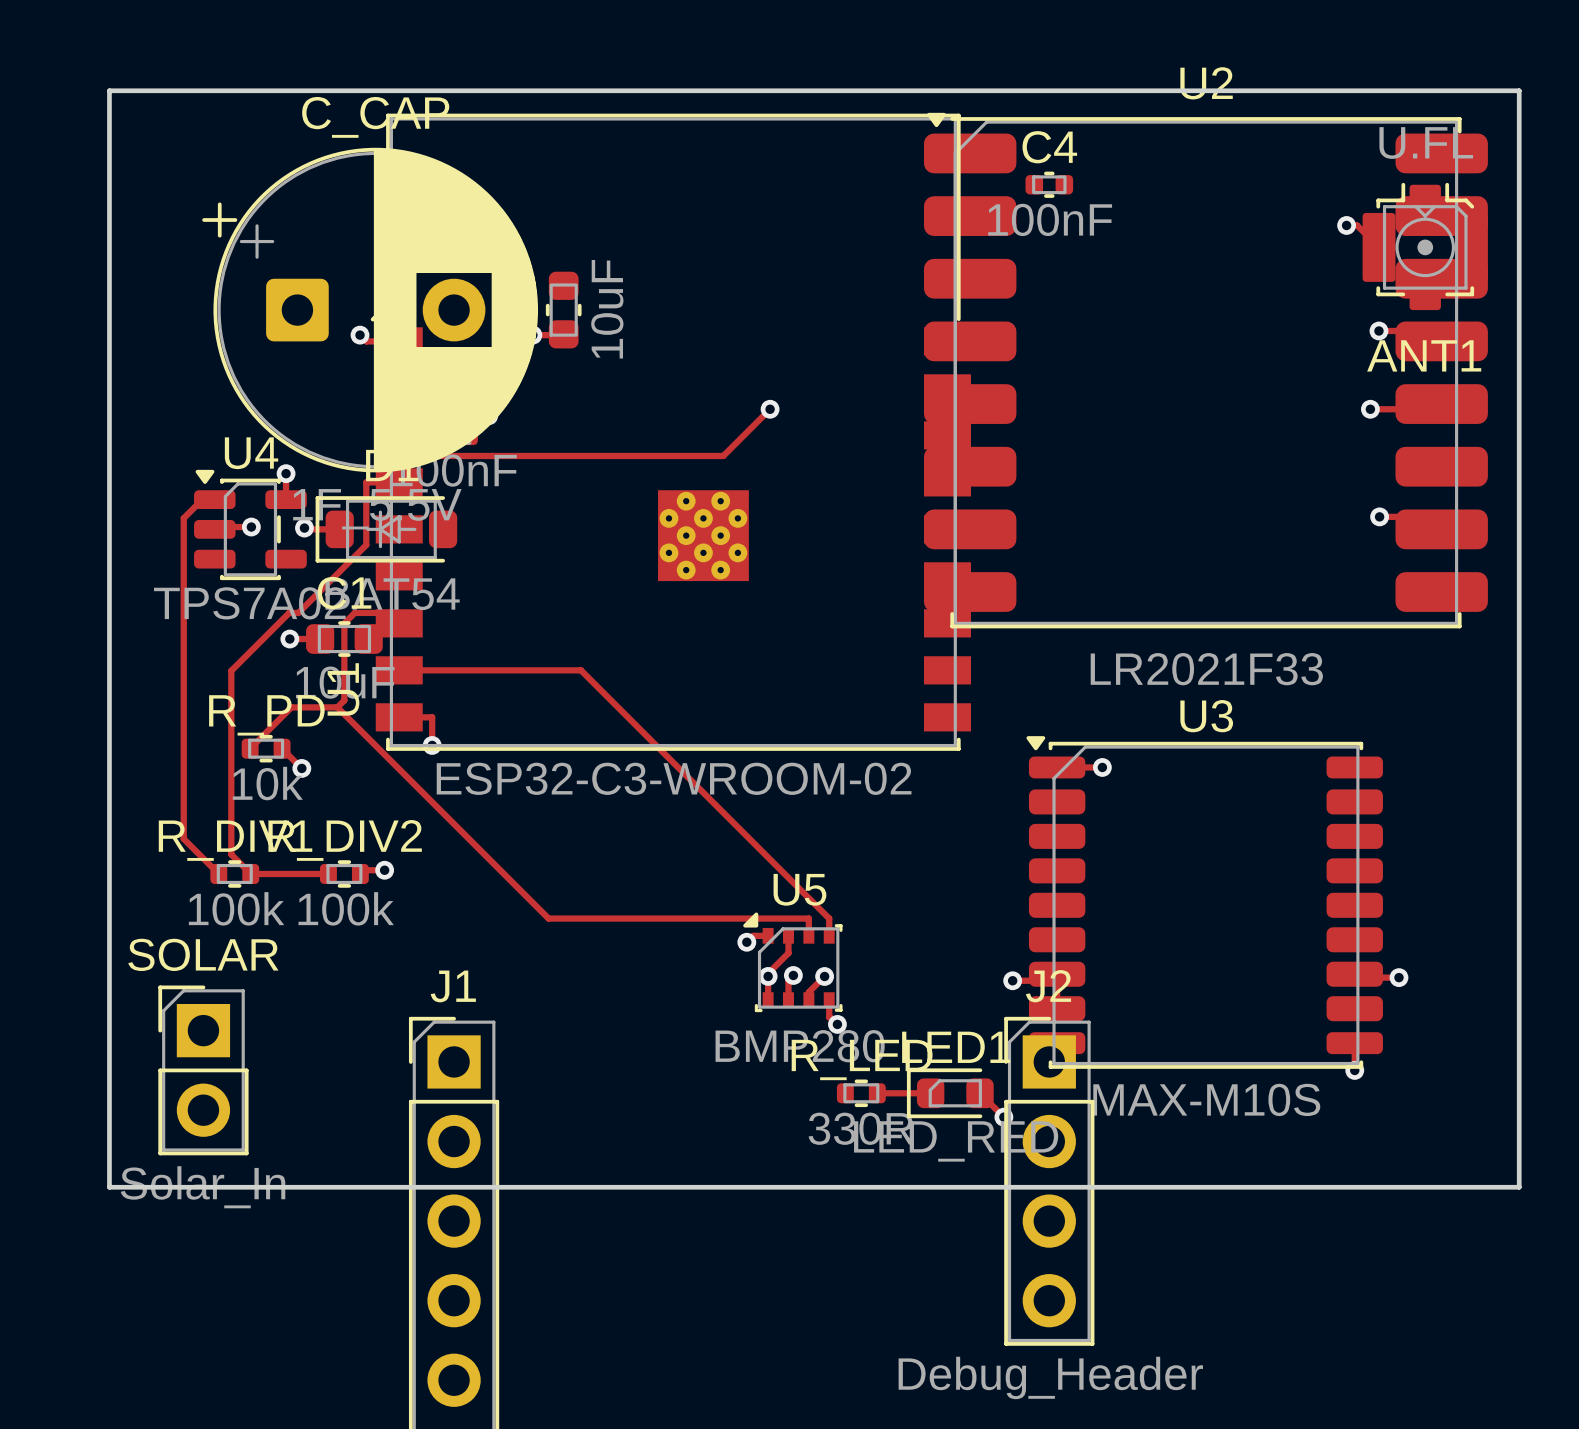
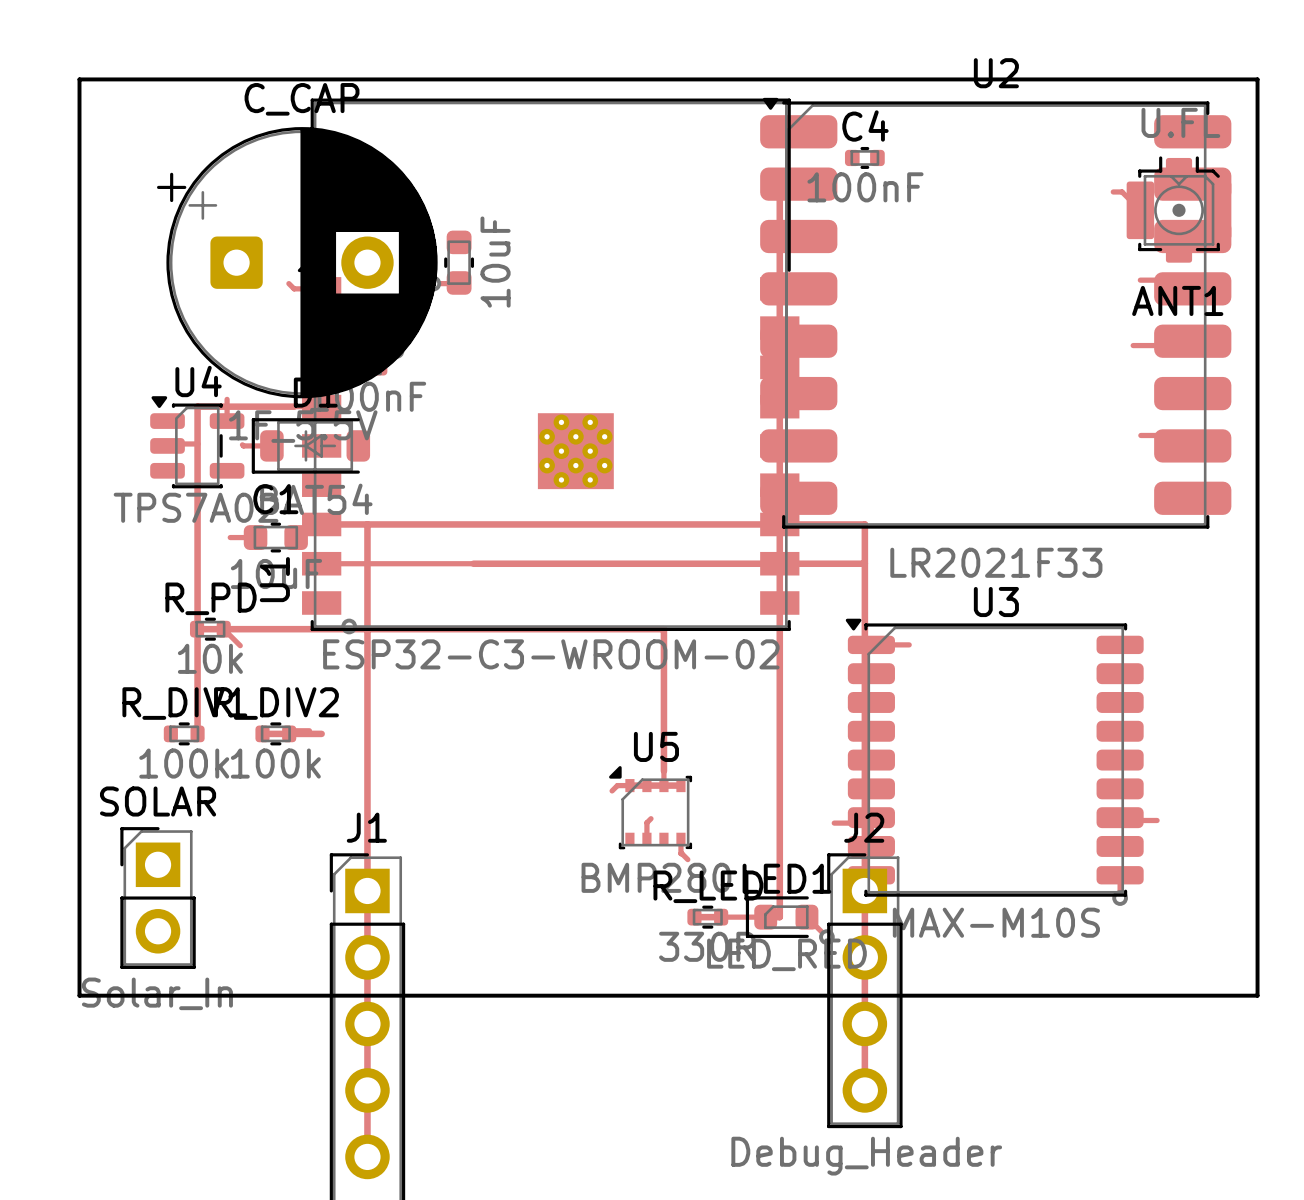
track: none -> (798, 184) (779, 184) (779, 917) (765, 917)
via: (1346, 225) -> none
via: (1378, 330) -> none
via: (360, 335) -> none
track: (770, 409) (723, 455) (419, 455) (399, 435) -> none
via: (770, 409) -> none
via: (1370, 409) -> none
via: (286, 473) -> none
track: (366, 482) (366, 545) (298, 612) (289, 612) (231, 670) (231, 854) (250, 873) (328, 873) -> (294, 406) (197, 406) (197, 733)
track: (214, 499) (202, 499) (183, 518) (183, 838) (218, 873) -> none
via: (1379, 516) -> none
via: (251, 527) -> none
via: (304, 528) -> none
track: (399, 623) (388, 612) (354, 612) (344, 623) (344, 700) (337, 707) -> (321, 524) (864, 524) (864, 1090)
track: none -> (367, 524) (367, 1156)
via: (289, 639) -> none
track: (581, 670) (829, 918) (829, 935) -> (629, 785) (680, 785)
track: none -> (473, 563) (864, 563)
track: (337, 707) (548, 918) (808, 918) -> (197, 629) (663, 629) (663, 771)
track: (337, 707) (291, 707) (250, 748) -> none
track: (399, 717) (432, 717) (432, 745) -> none
via: (1102, 767) -> none
via: (301, 768) -> none
via: (384, 870) -> none
track: none -> (262, 733) (321, 733)
track: (788, 935) (788, 953) (768, 973) (768, 1000) -> none
via: (746, 942) -> none
via: (793, 975) -> none
via: (768, 976) -> none
track: (824, 976) (808, 992) (808, 1000) -> none
via: (824, 976) -> none
via: (1398, 977) -> none
via: (1012, 980) -> none
via: (837, 1024) -> none
track: none -> (694, 917) (721, 917)

